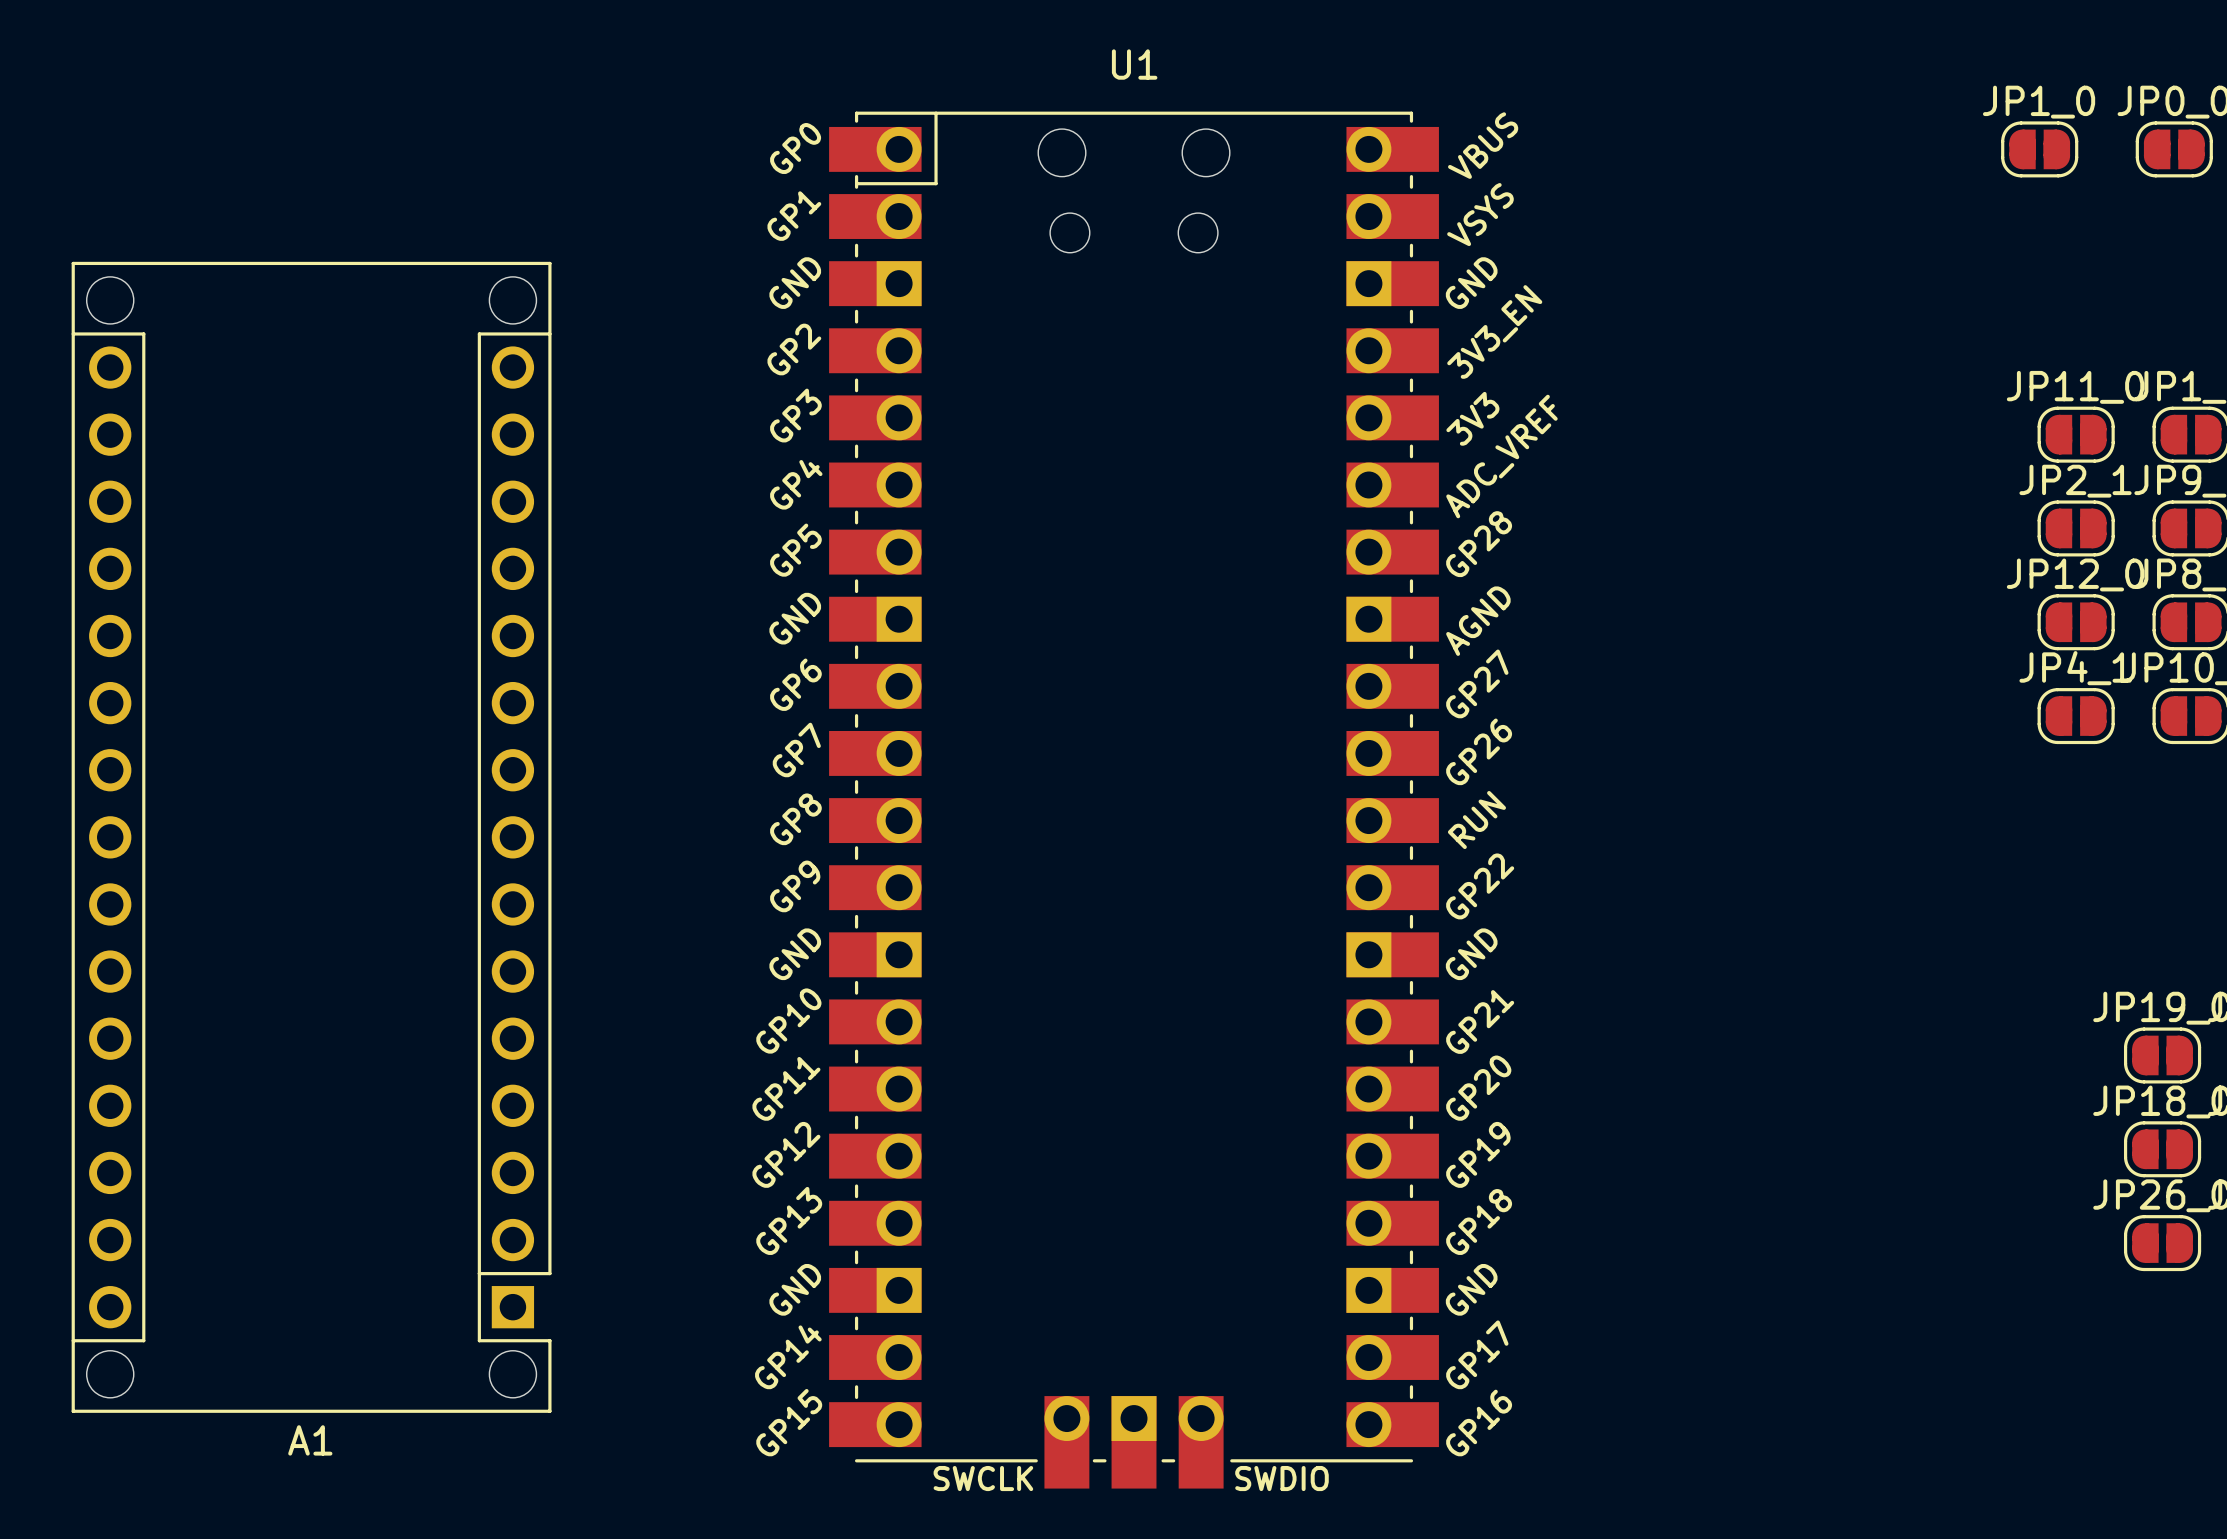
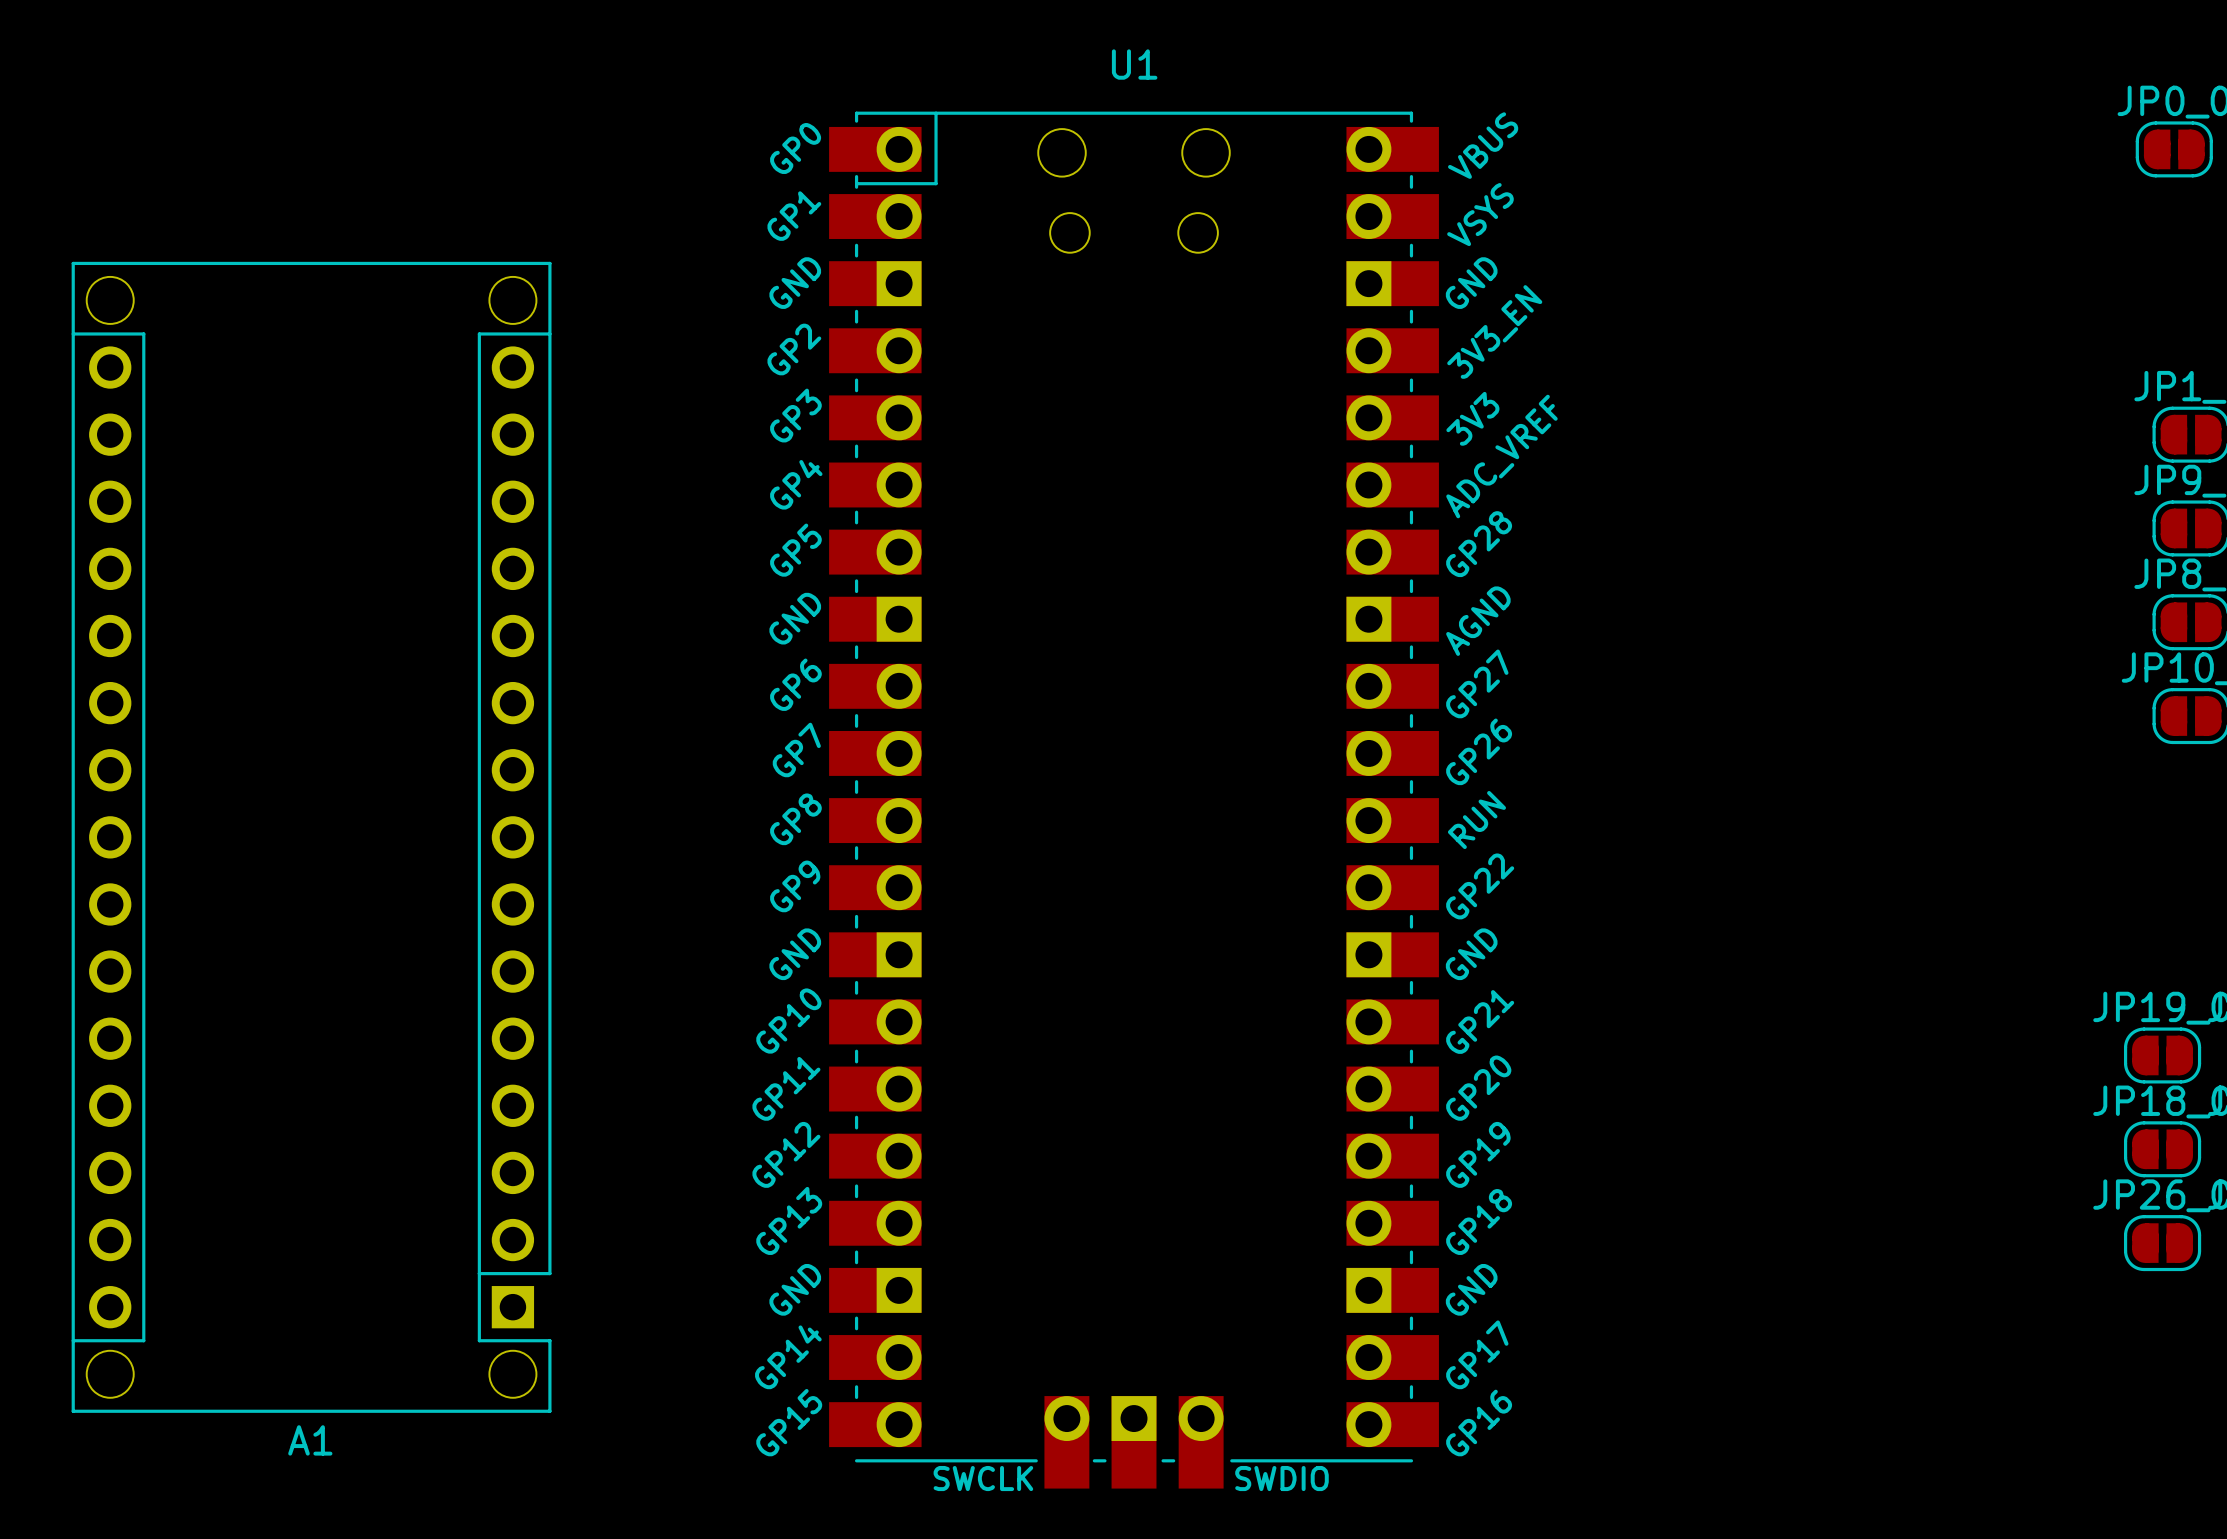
JP1_0: (2039, 149) -> none
JP11_0: (2076, 434) -> none
JP2_1: (2076, 528) -> none
JP12_0: (2076, 622) -> none
JP4_1: (2076, 716) -> none

